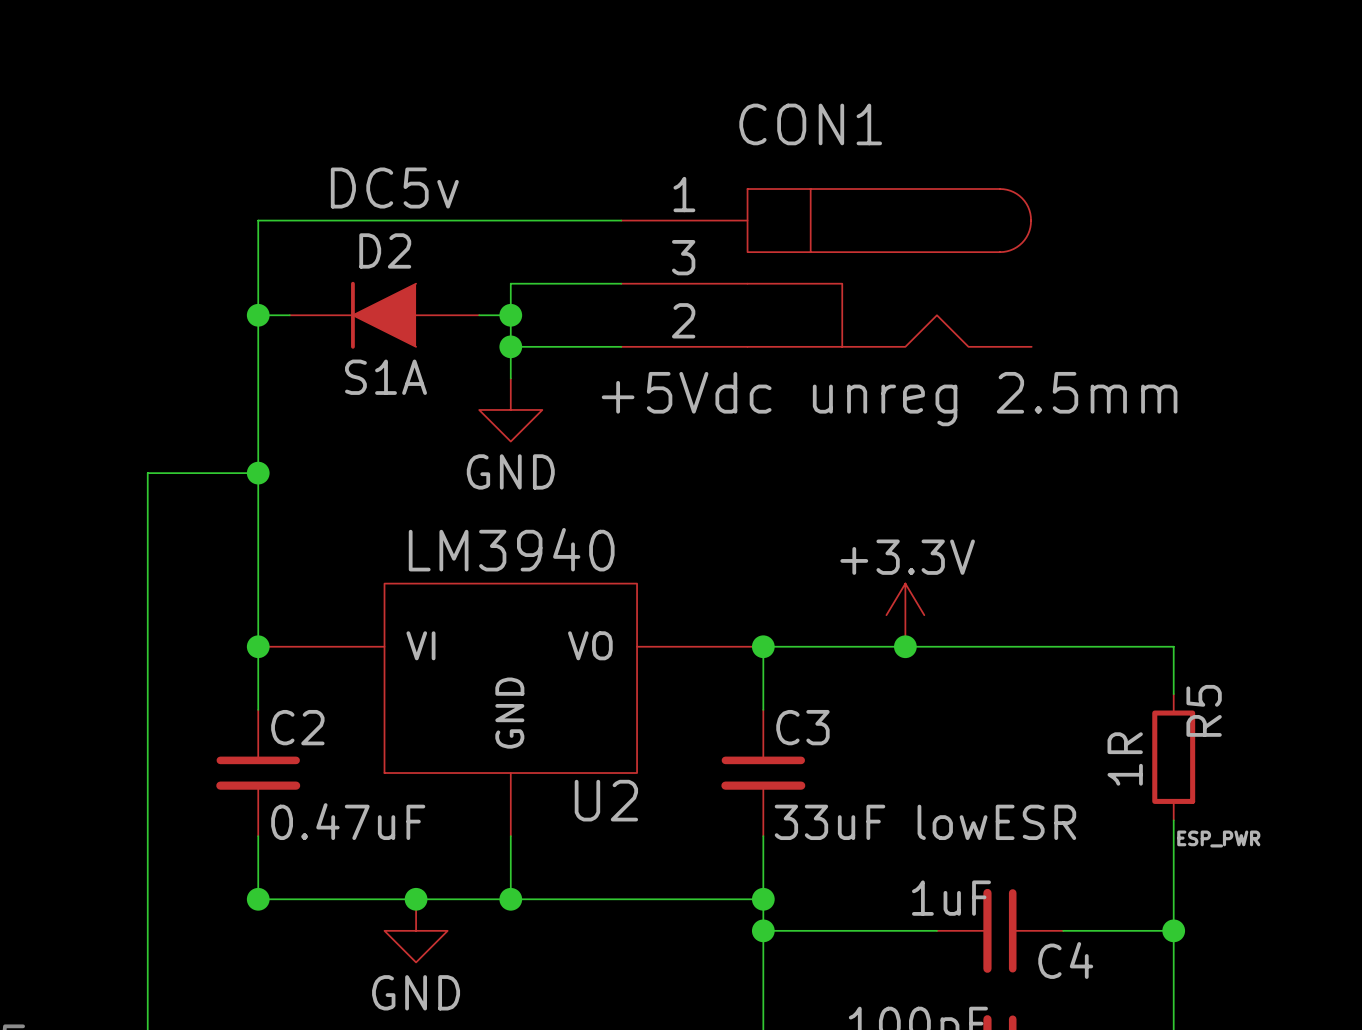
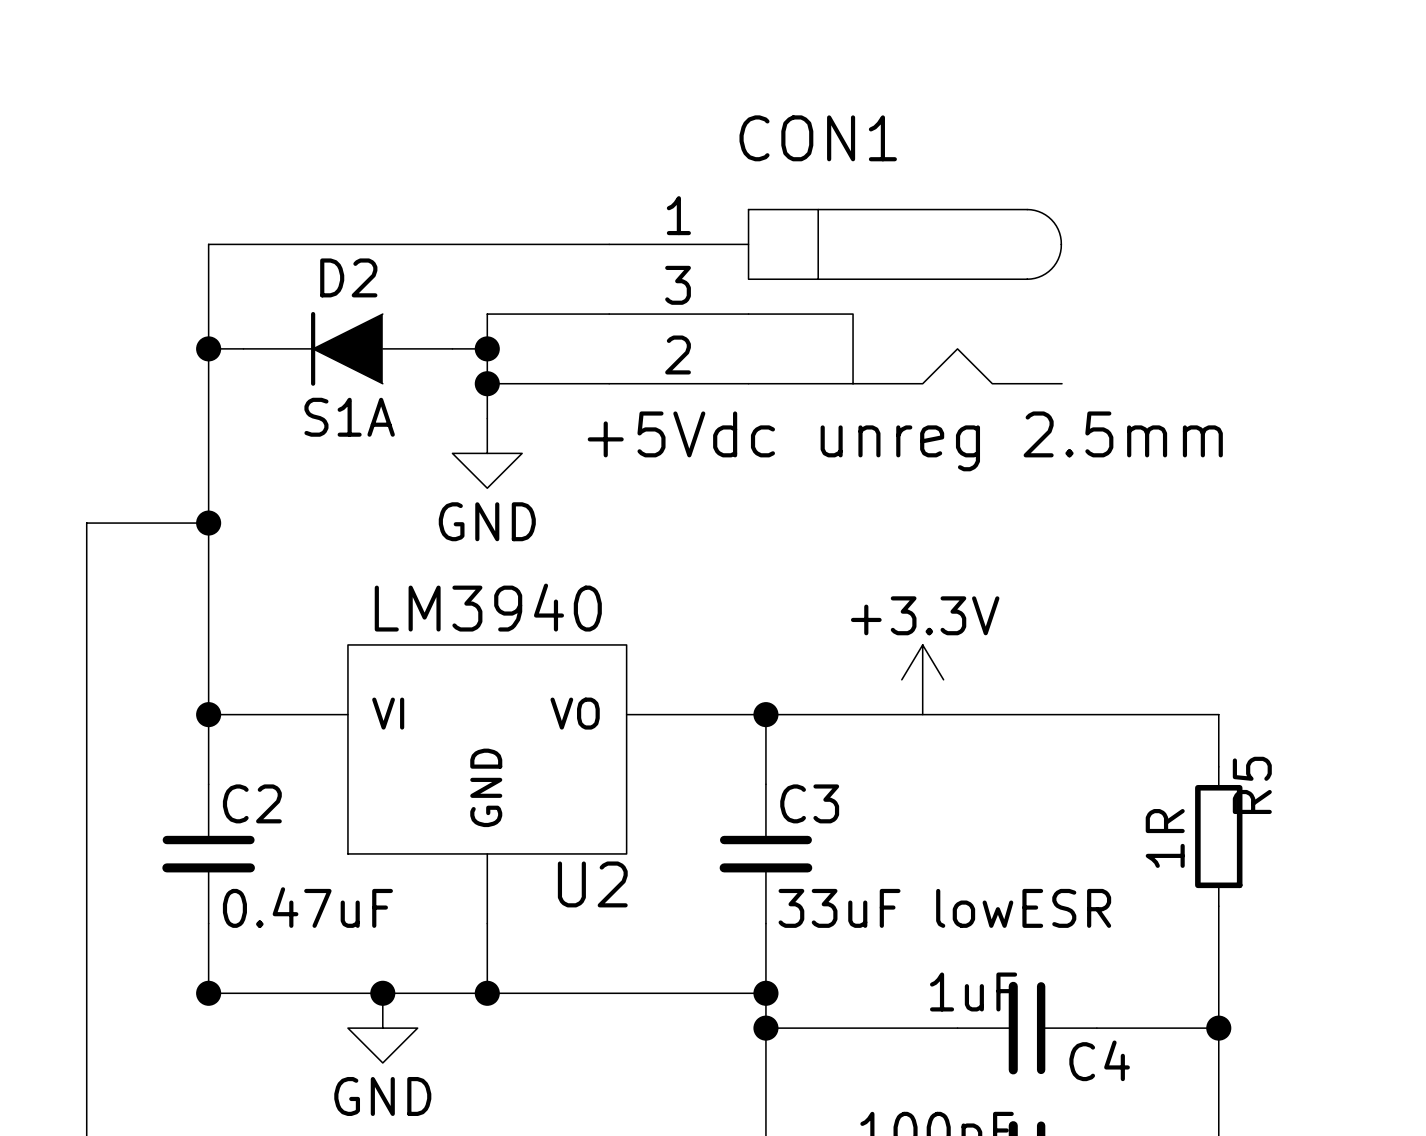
label: DC5v (394, 188) -> none
junction: (905, 646) -> none
label: ESP_PWR (1218, 838) -> none

